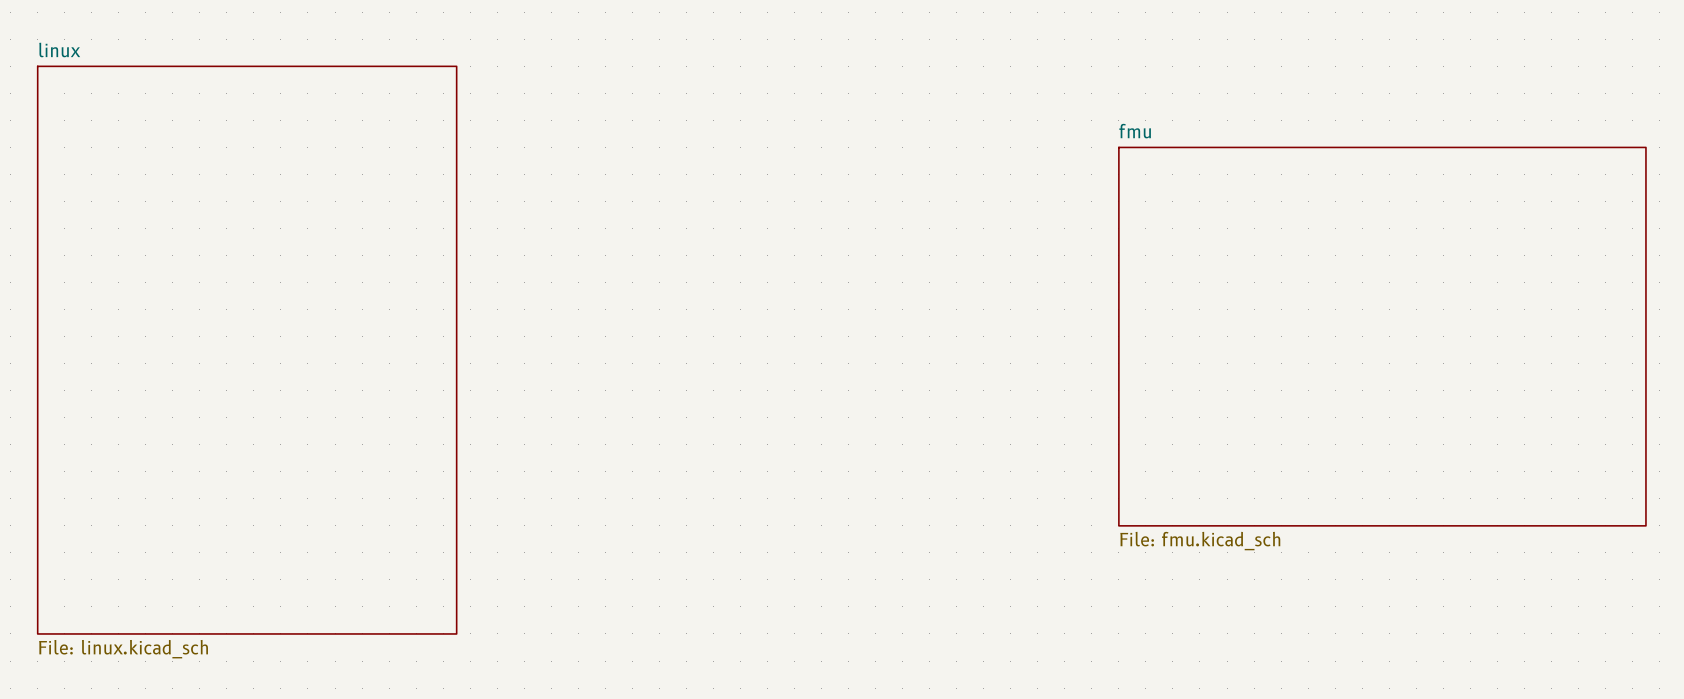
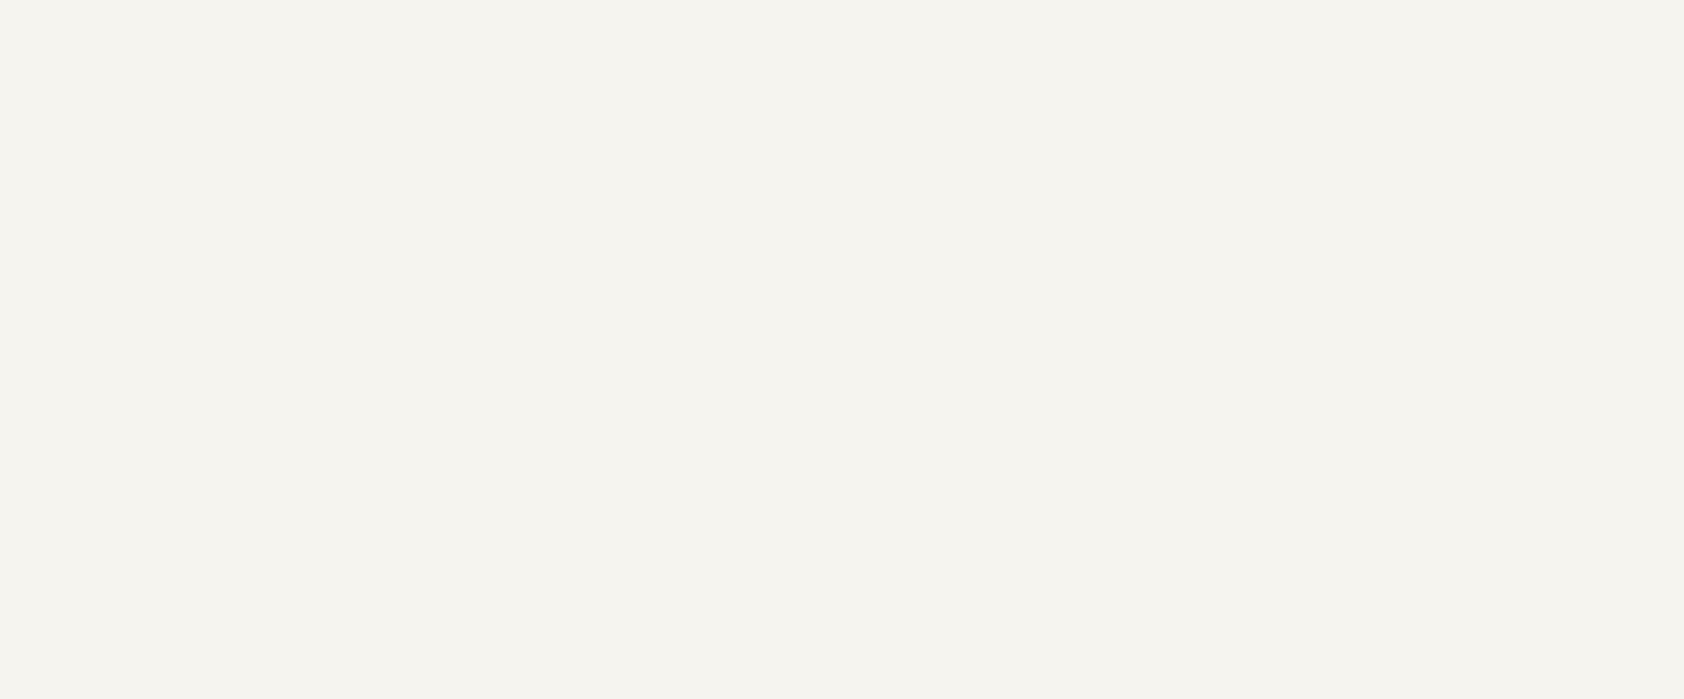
sheet fmu: File: fmu.kicad_sch (1382, 336) -> none
sheet linux: File: linux.kicad_sch (247, 350) -> none

